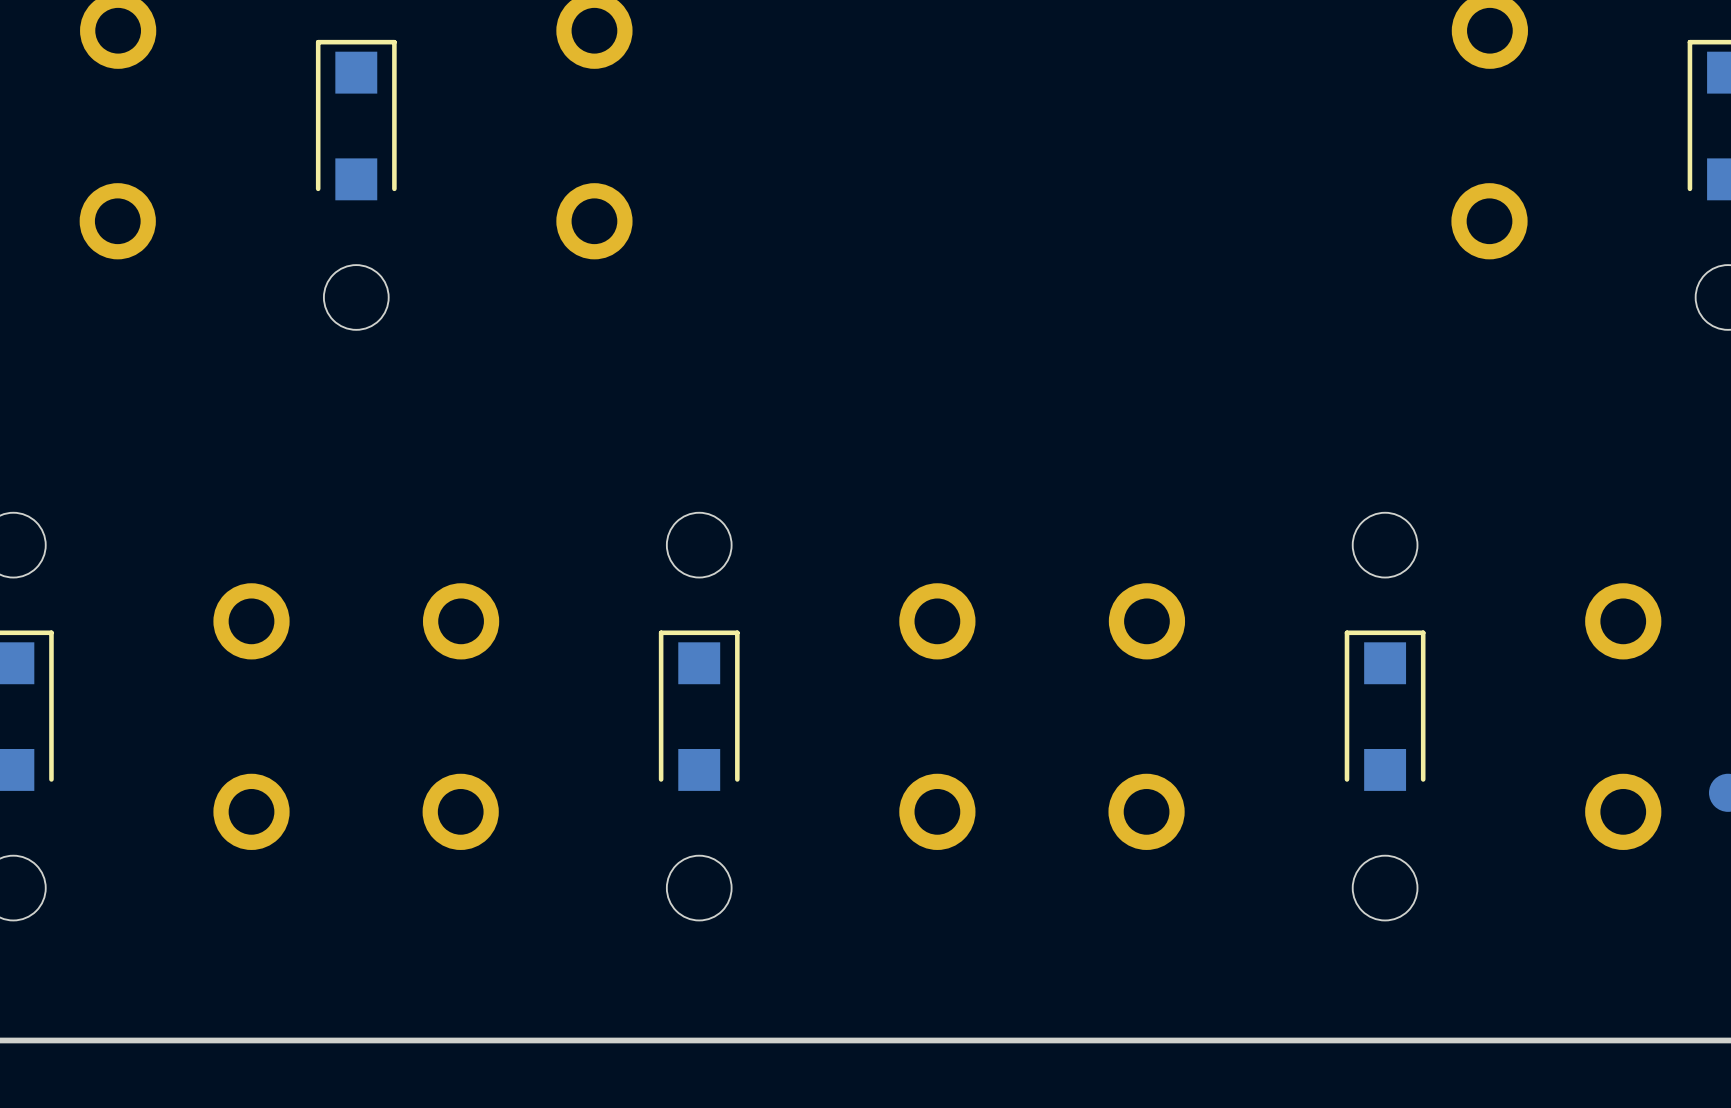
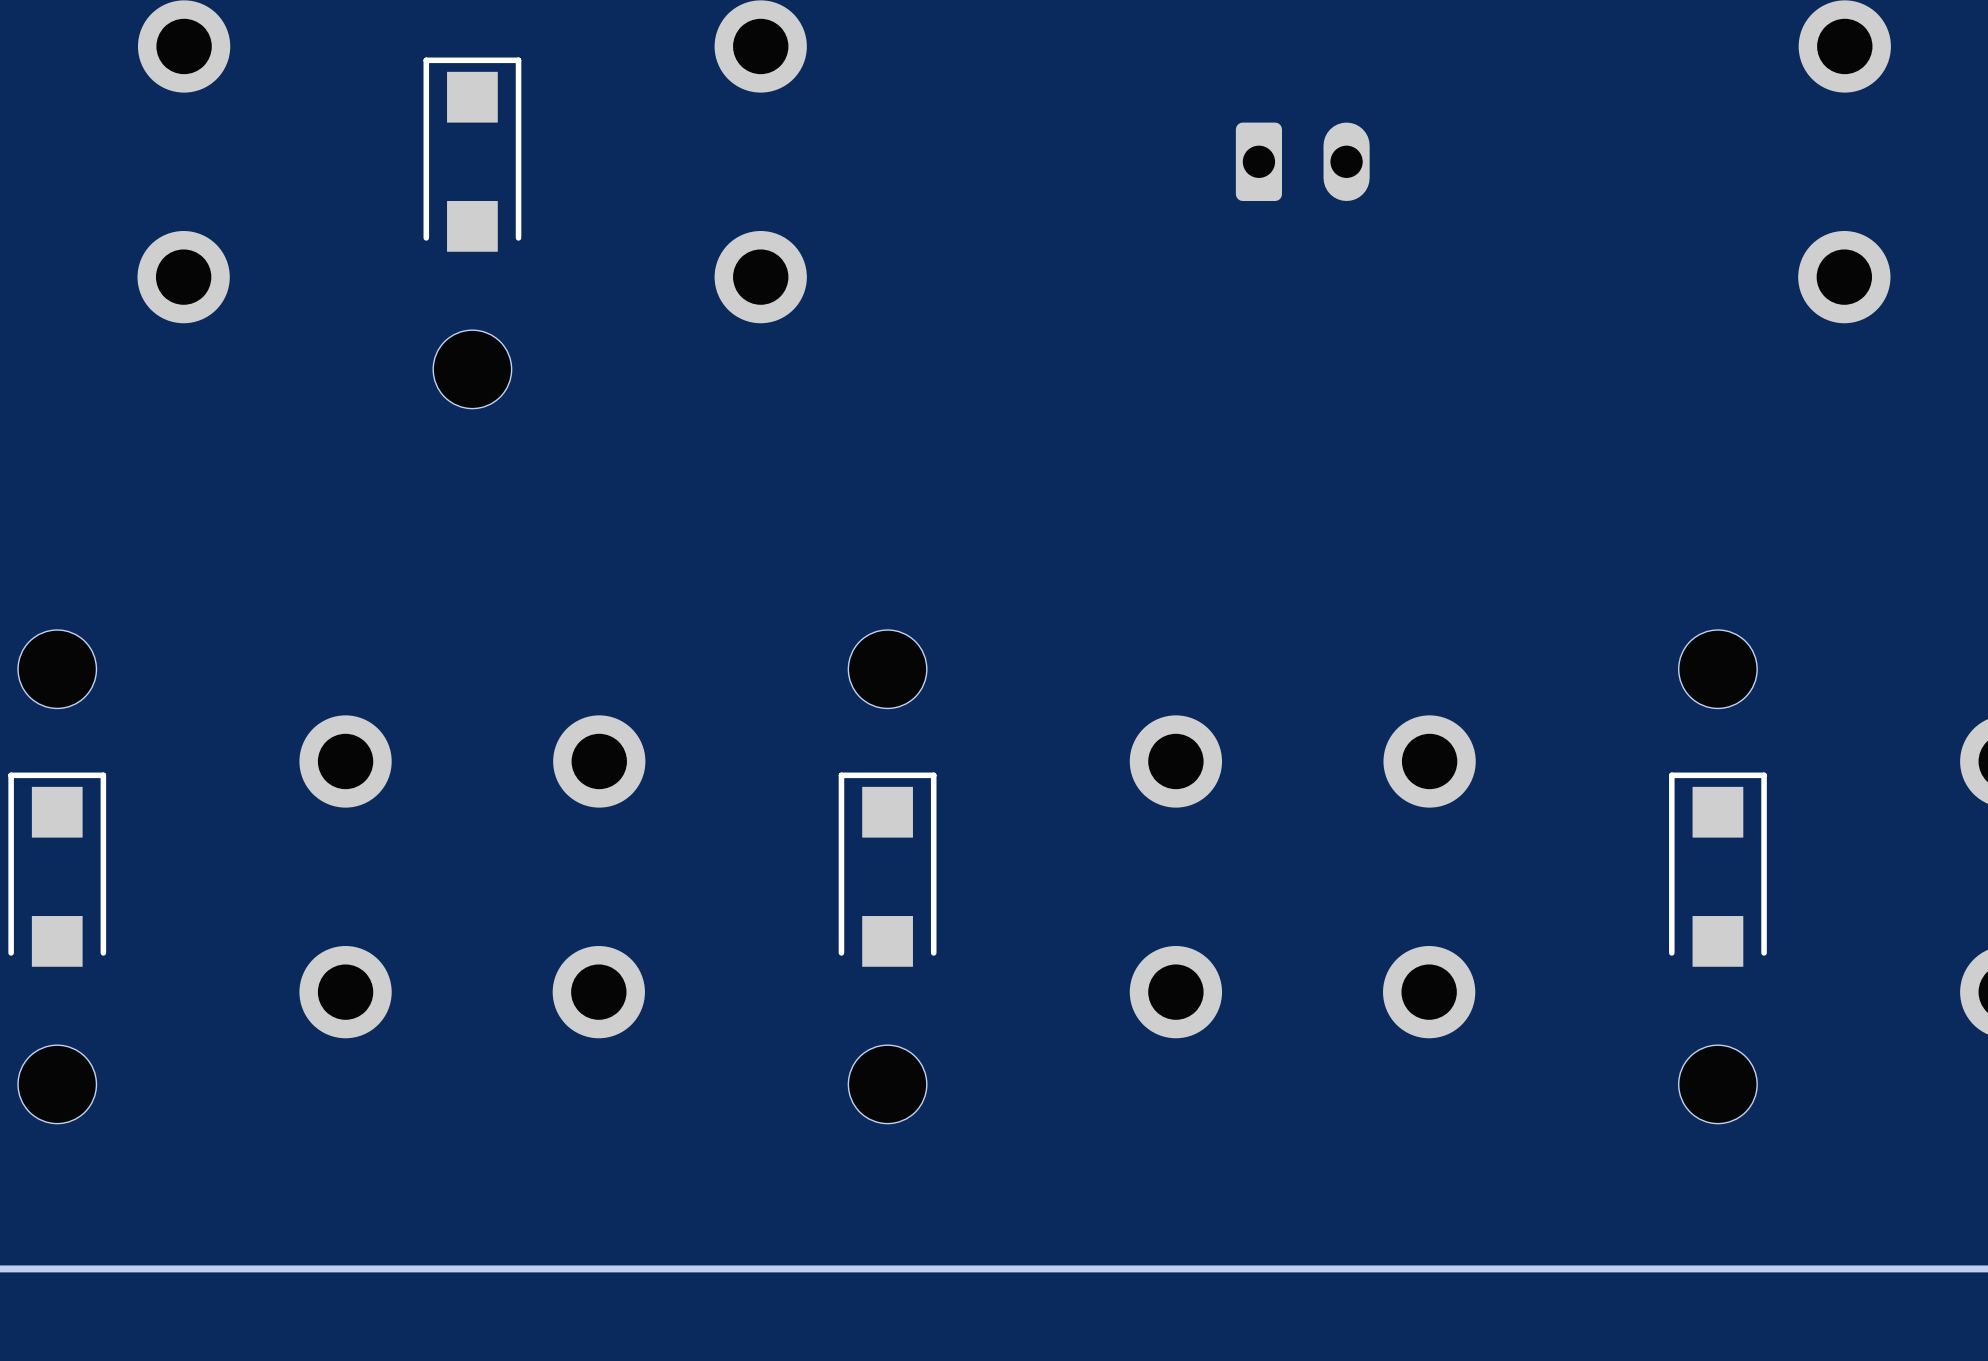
part: none -> (1302, 161)

